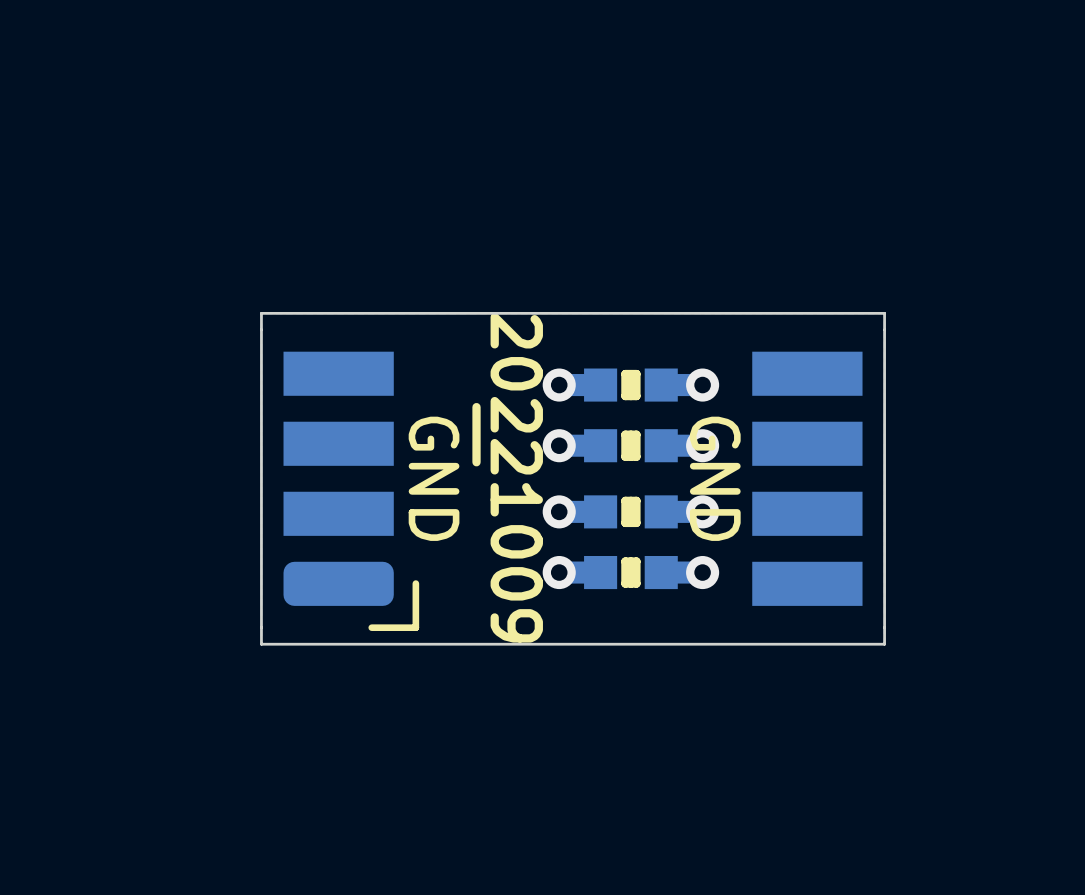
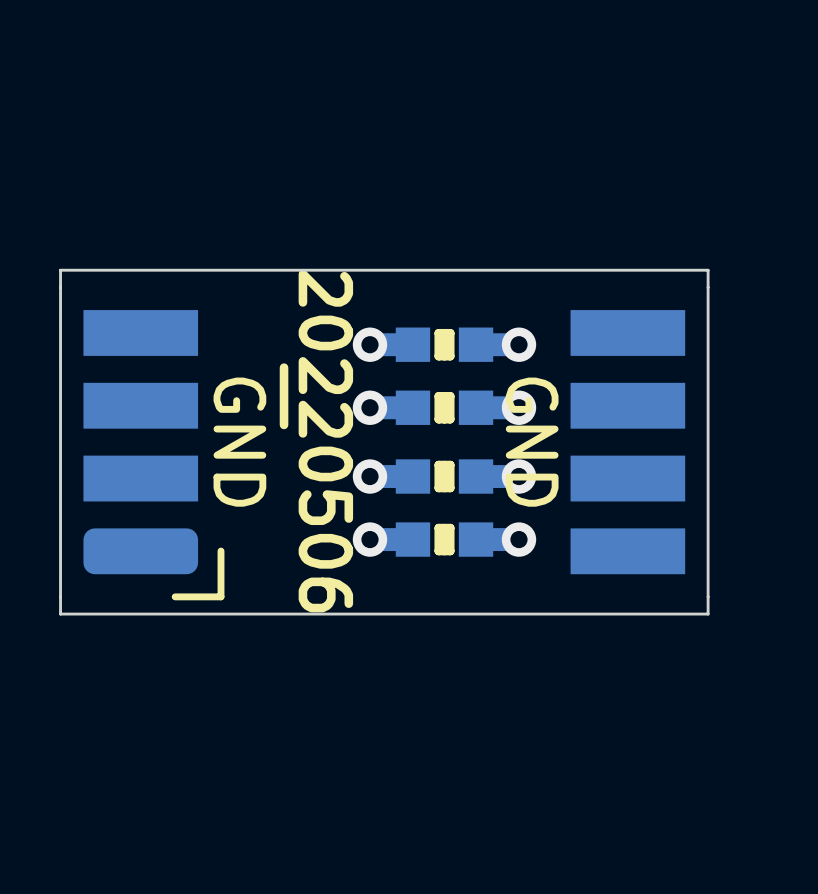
drawing shape: [472, 312, 543, 643] -> [279, 269, 354, 613]

